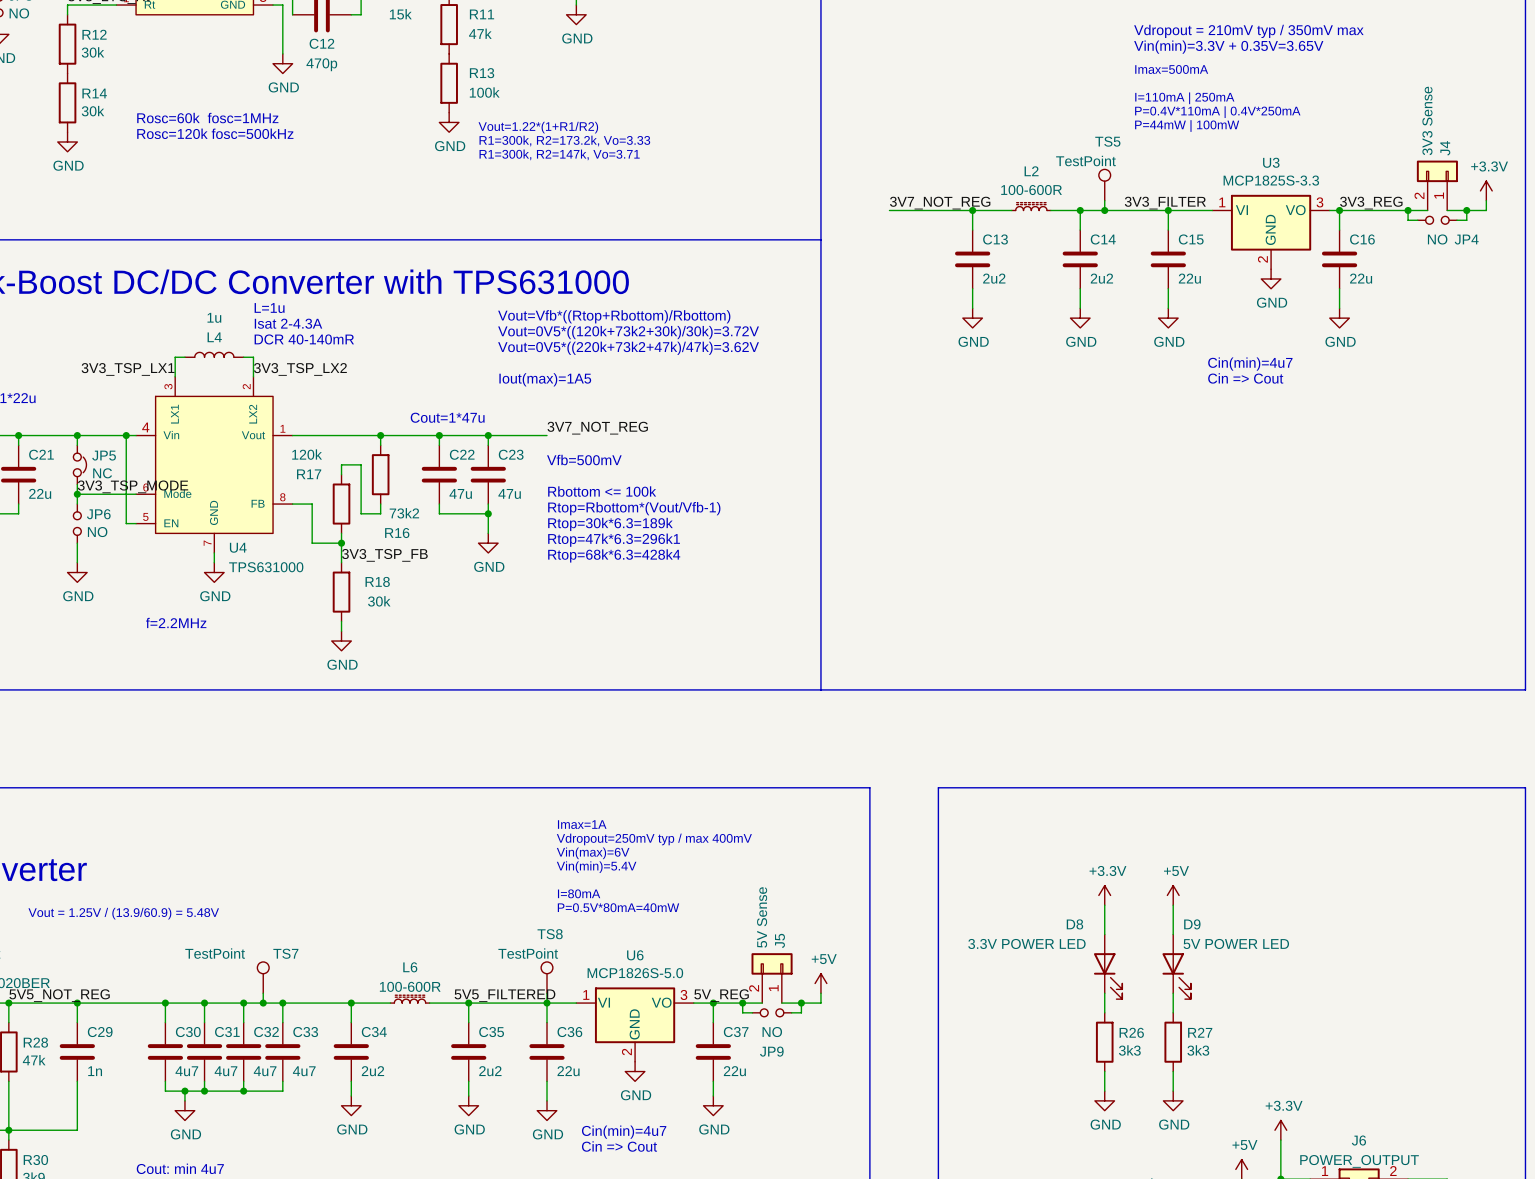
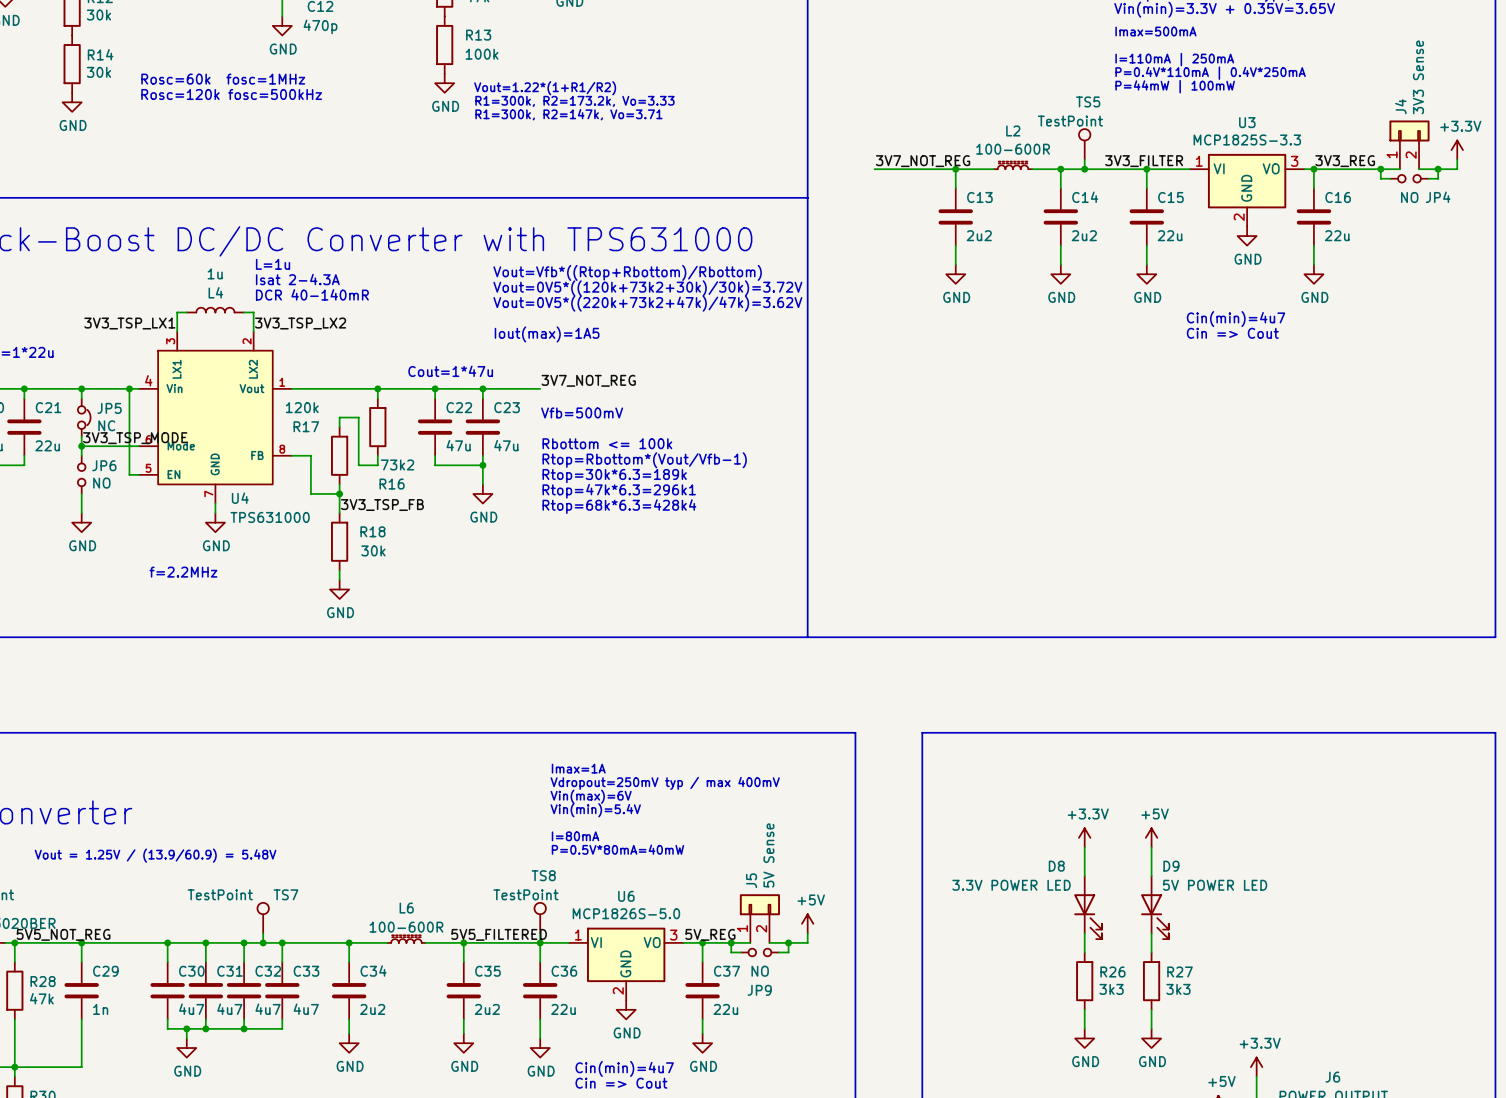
J4 flip: as is (1437, 171) -> left-right (1409, 130)
J5 flip: as is (772, 963) -> left-right (759, 904)

